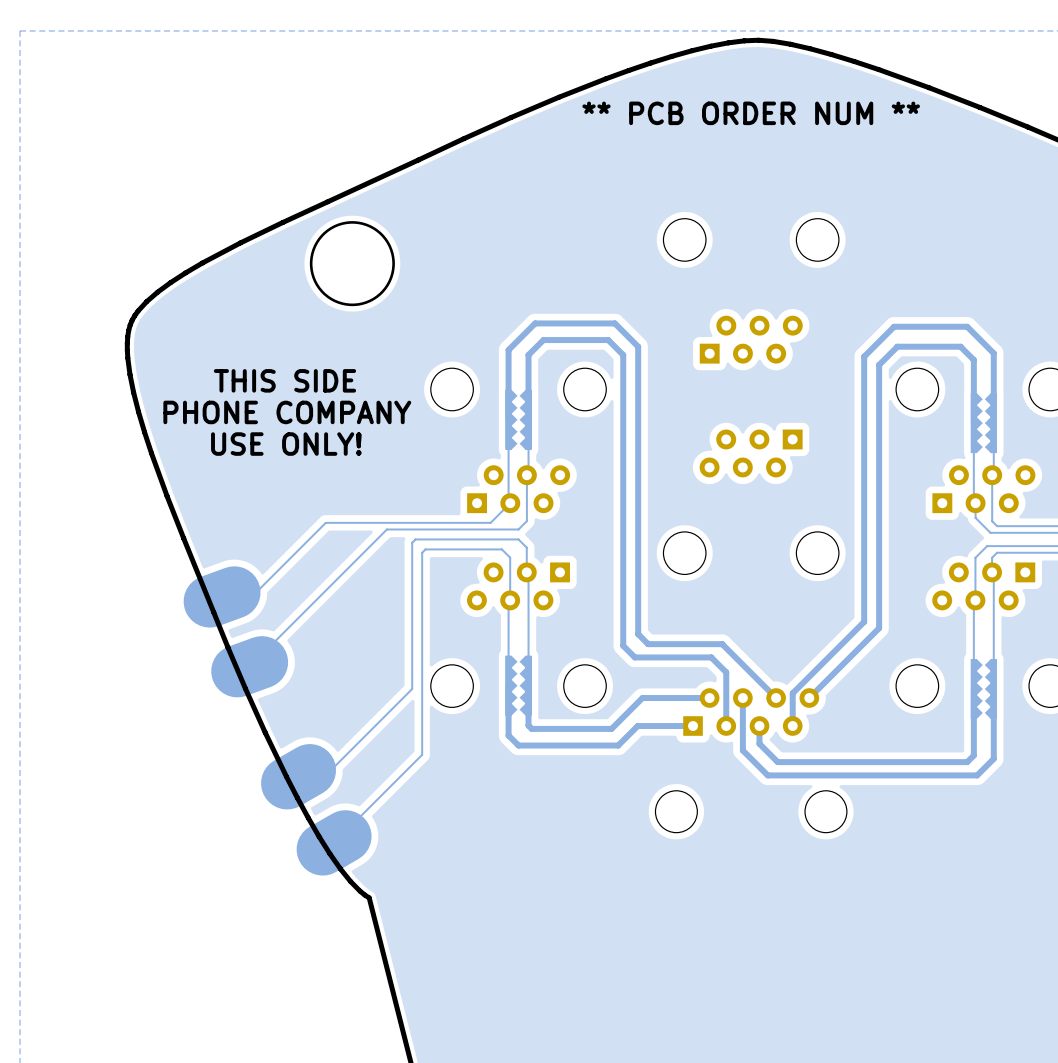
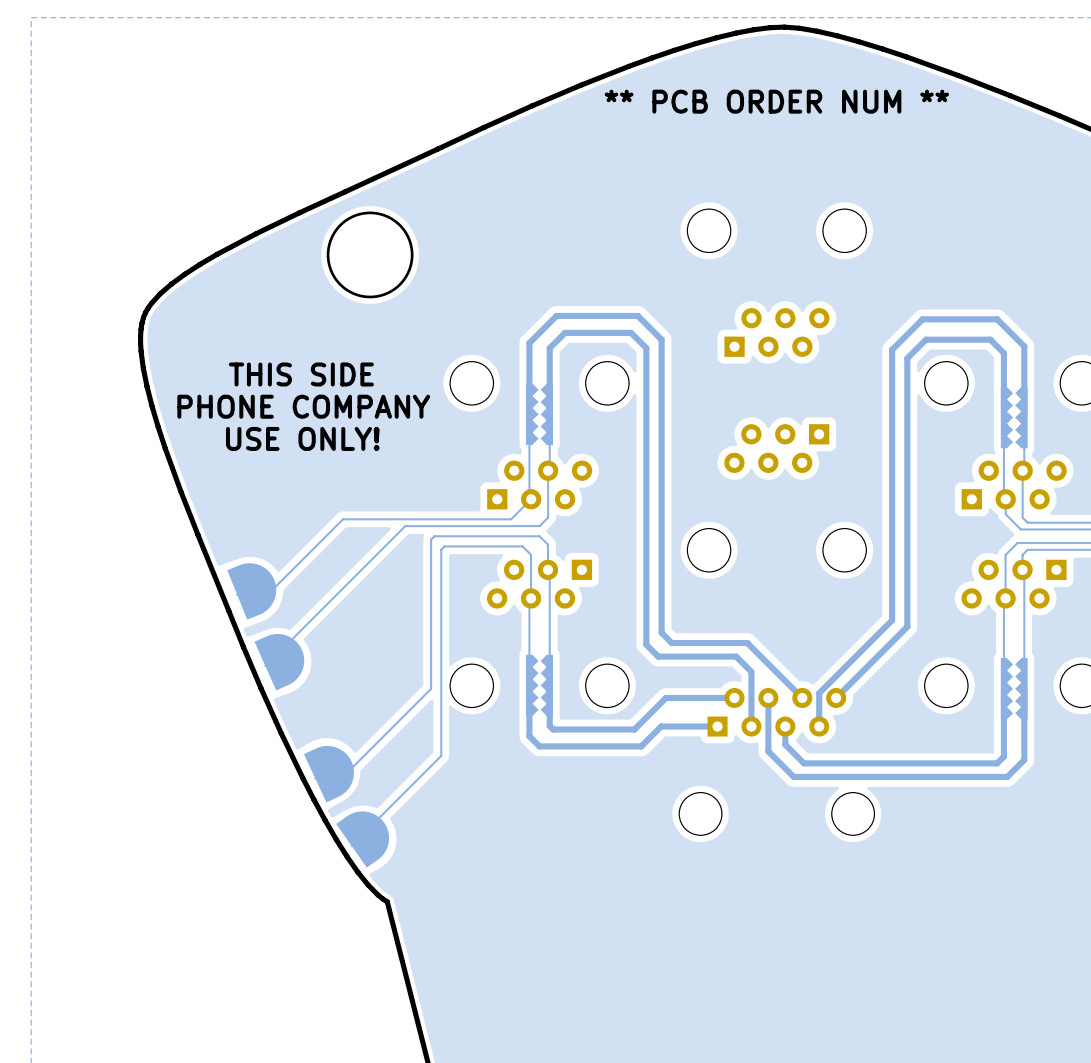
part: none -> (251, 591)
part: (222, 596) -> none
part: none -> (279, 662)
part: (249, 666) -> none
part: none -> (328, 774)
part: (298, 776) -> none
part footprint: [296, 810, 372, 876] -> [336, 811, 390, 868]

